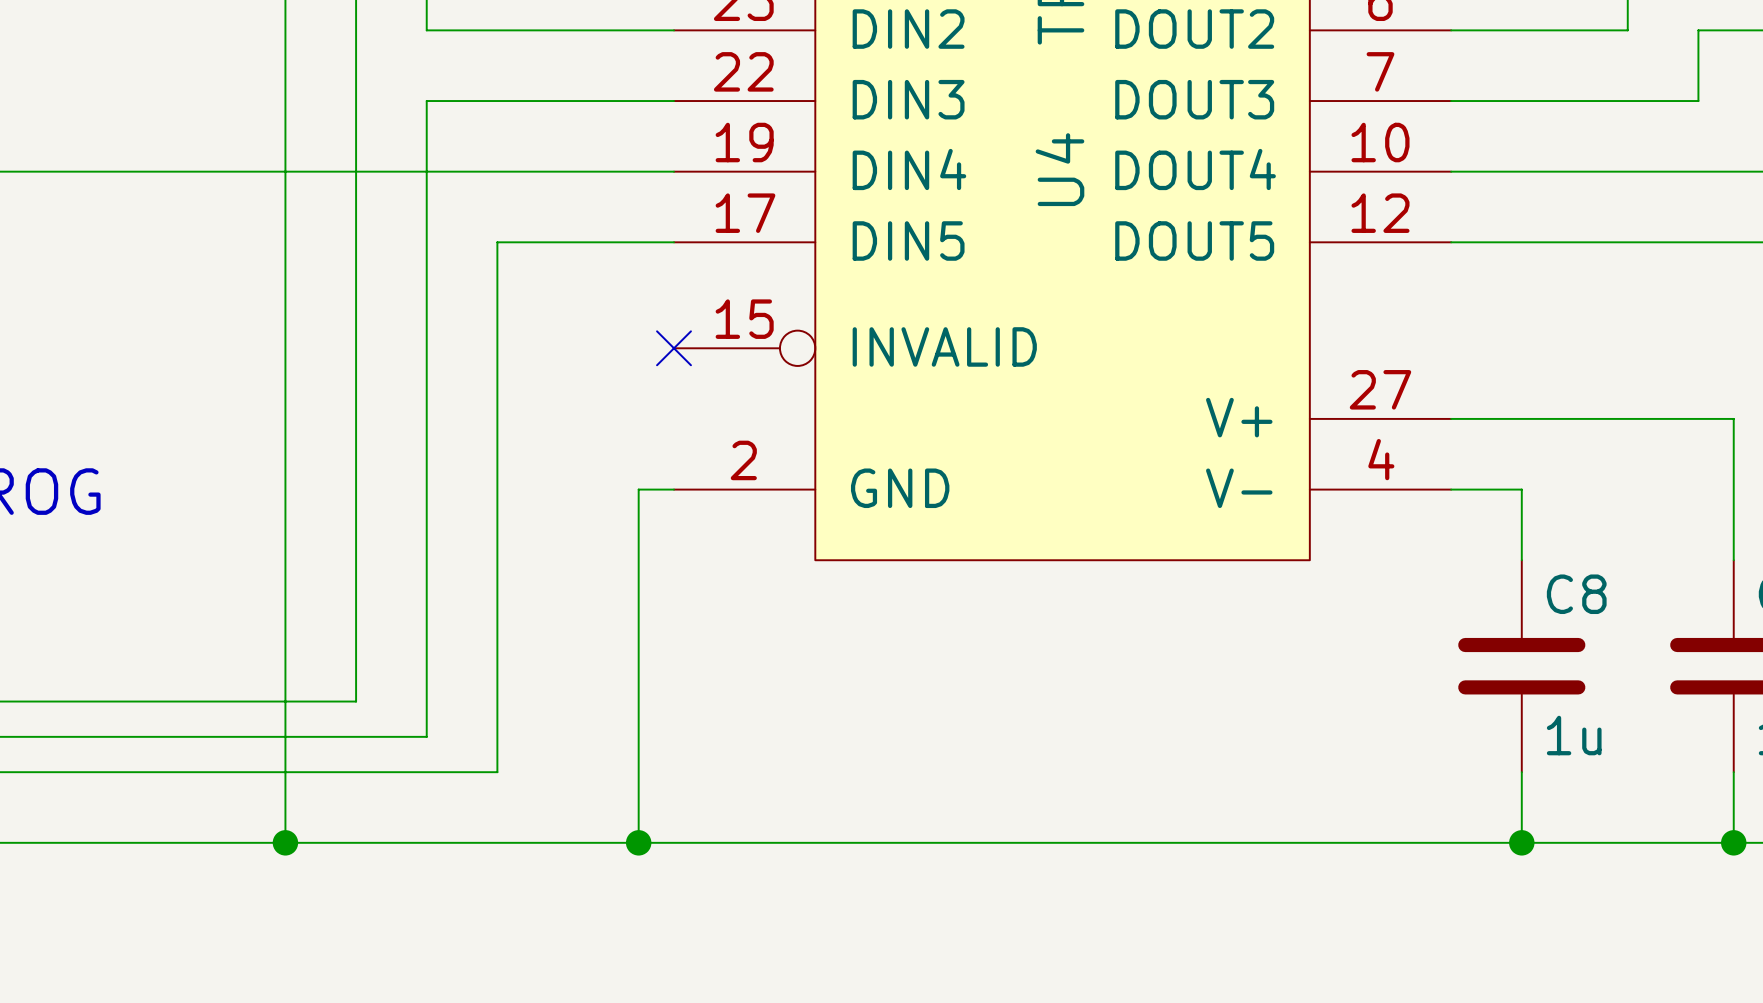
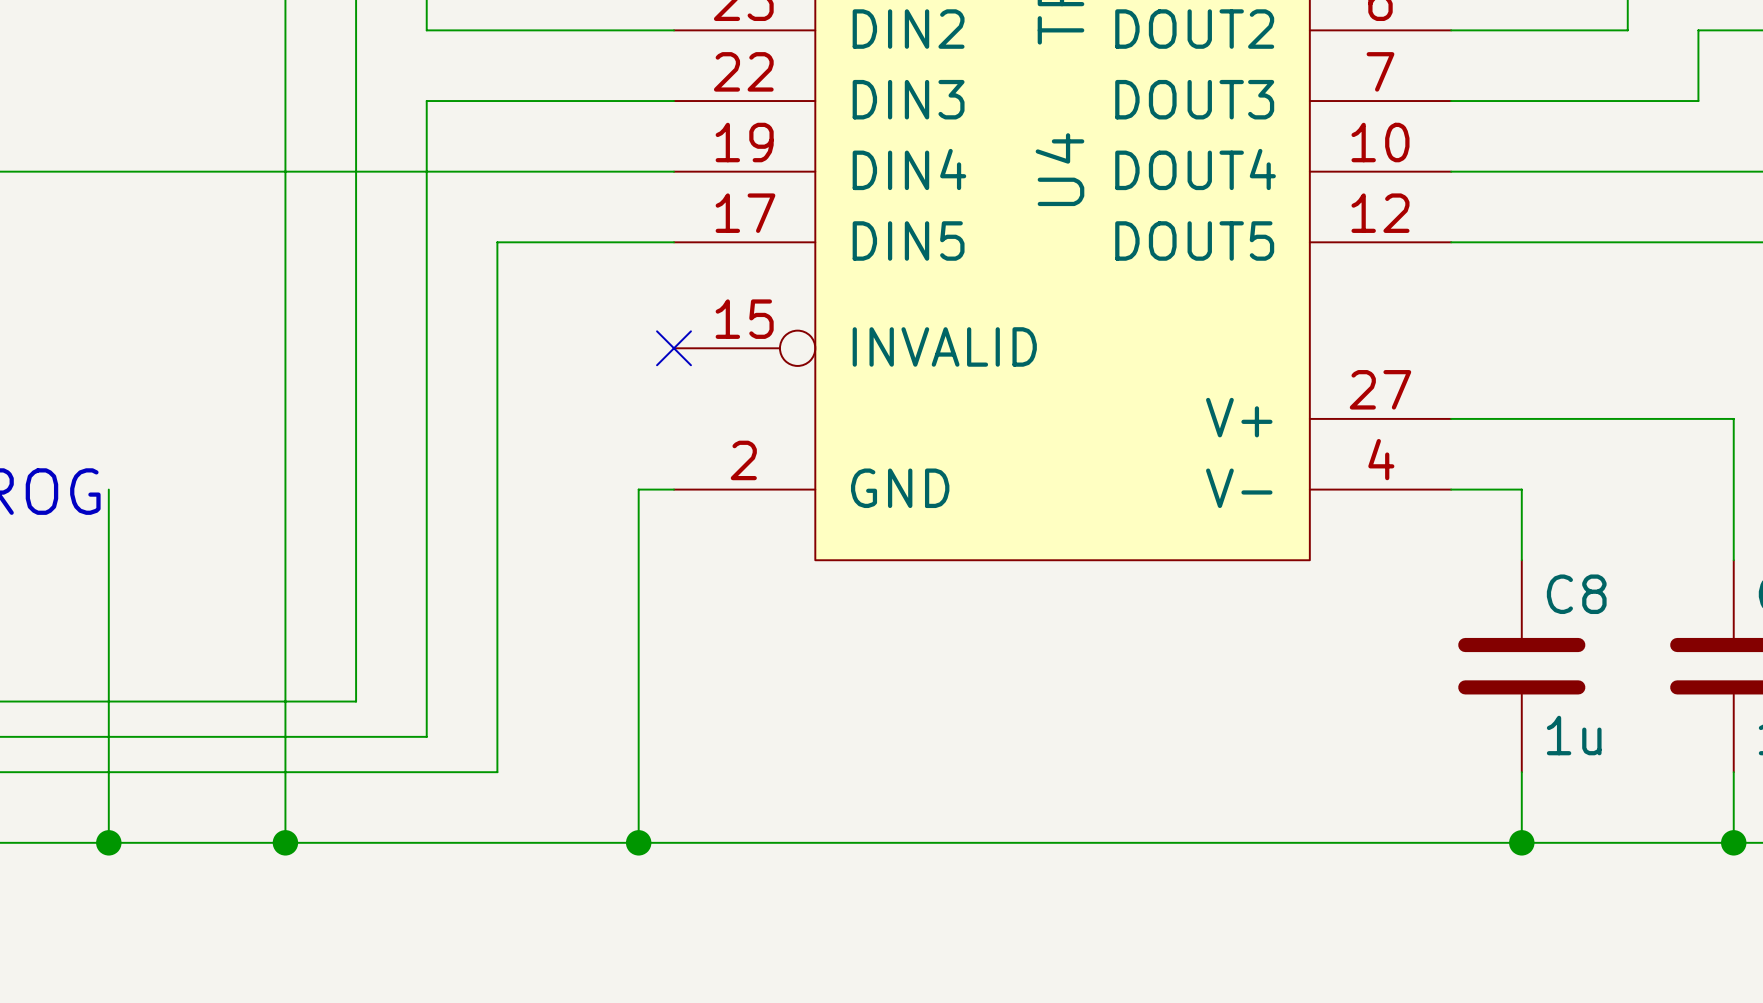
wire: none -> (108, 489) (108, 842)
junction: none -> (108, 842)

